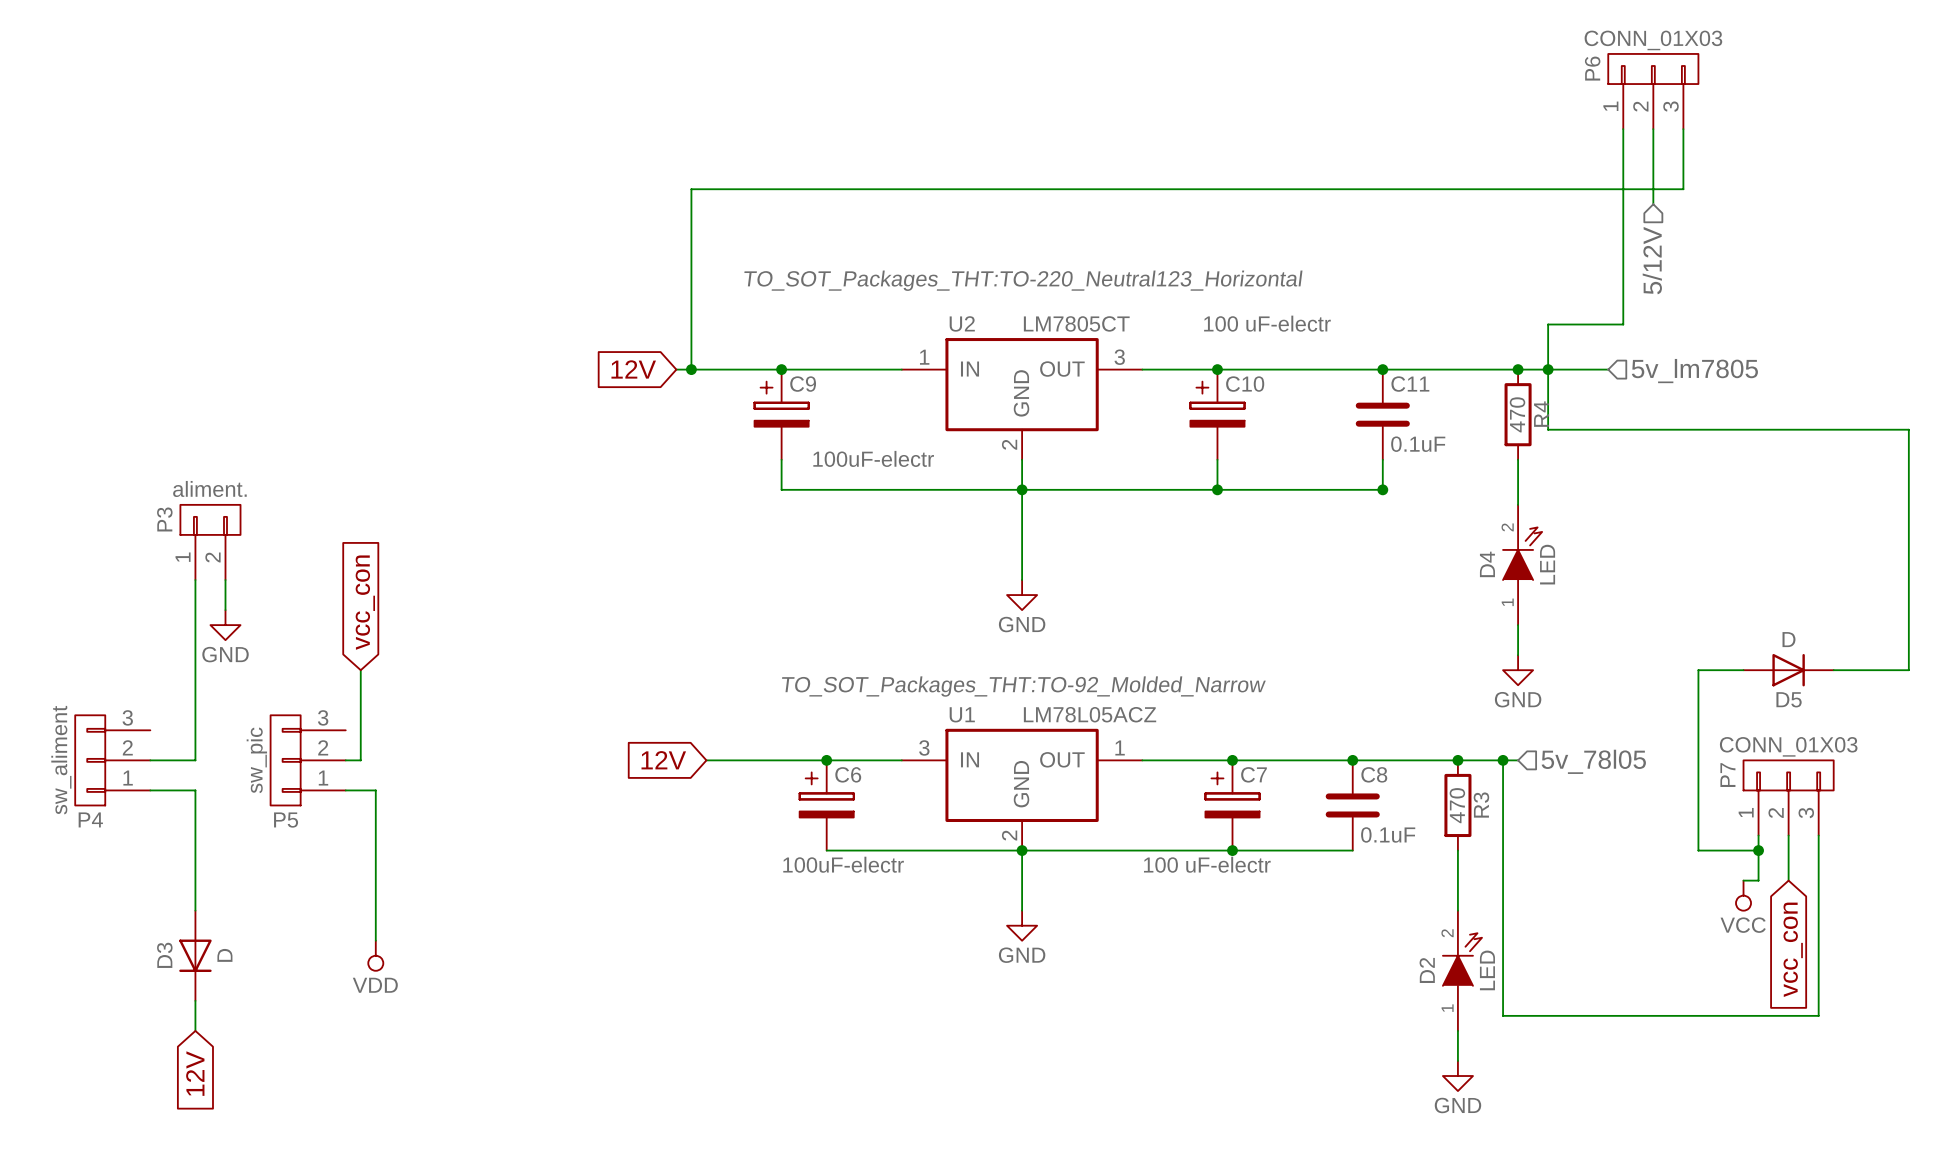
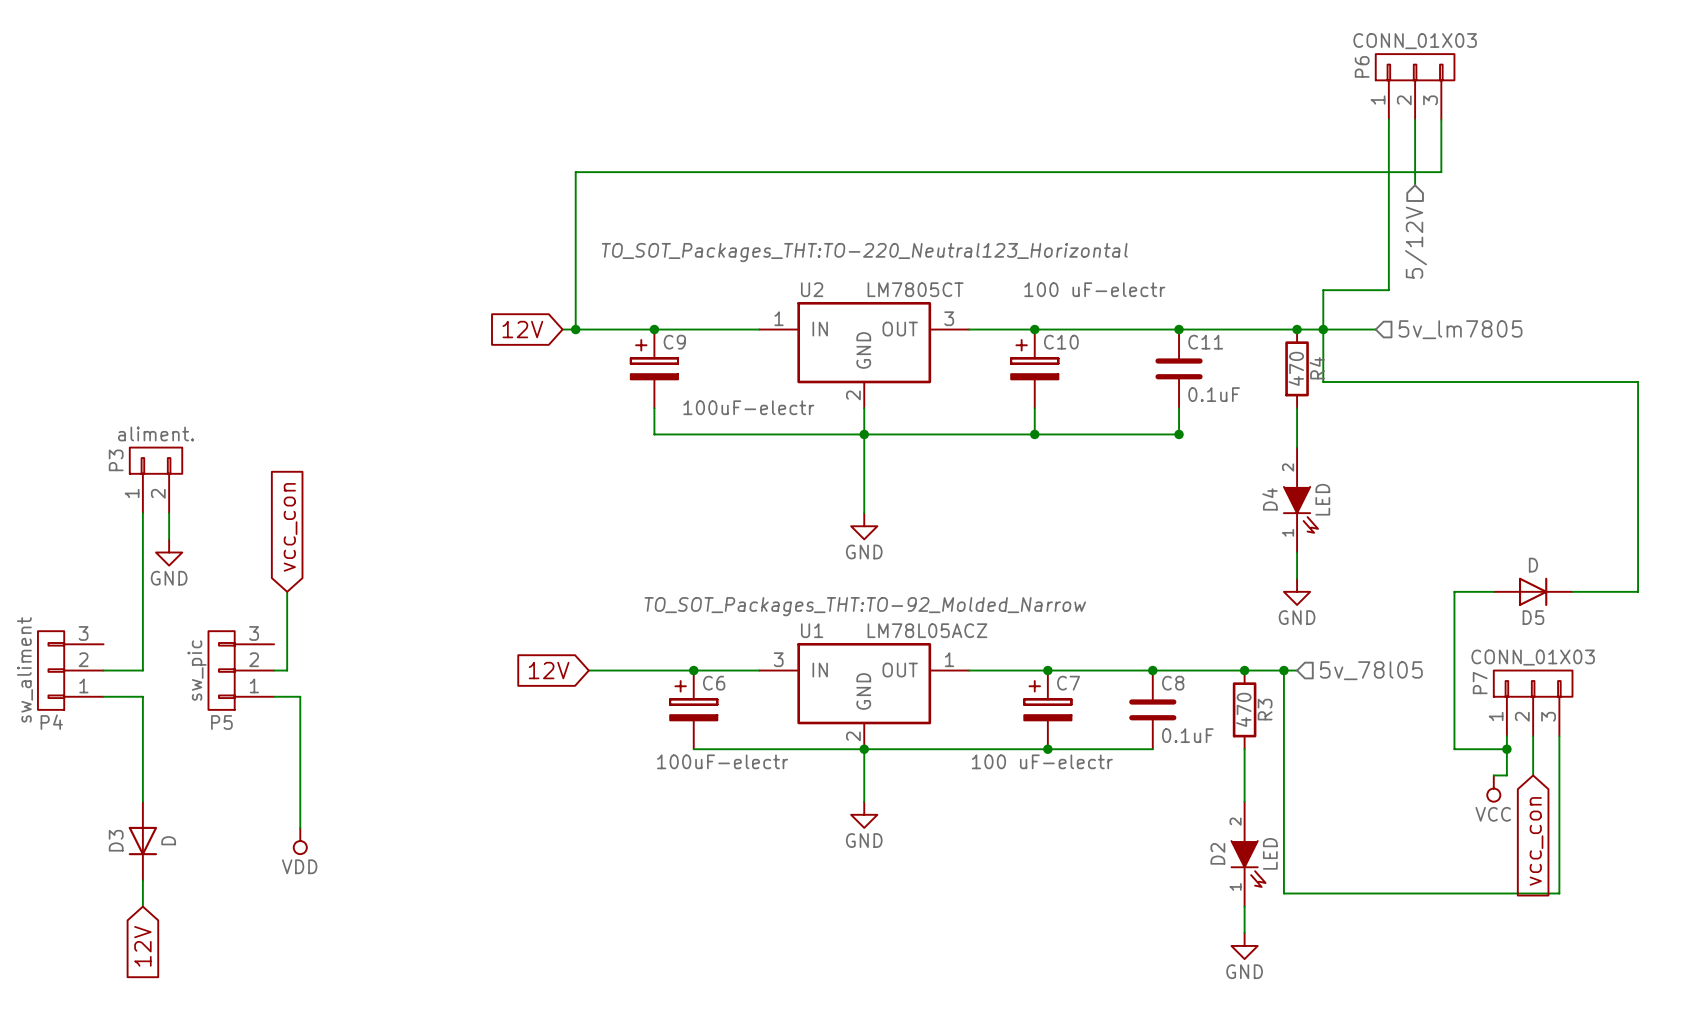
D4 symbol: [1503, 504, 1543, 626] -> [1283, 447, 1319, 553]
D2 symbol: [1442, 910, 1483, 1031] -> [1231, 801, 1266, 907]

